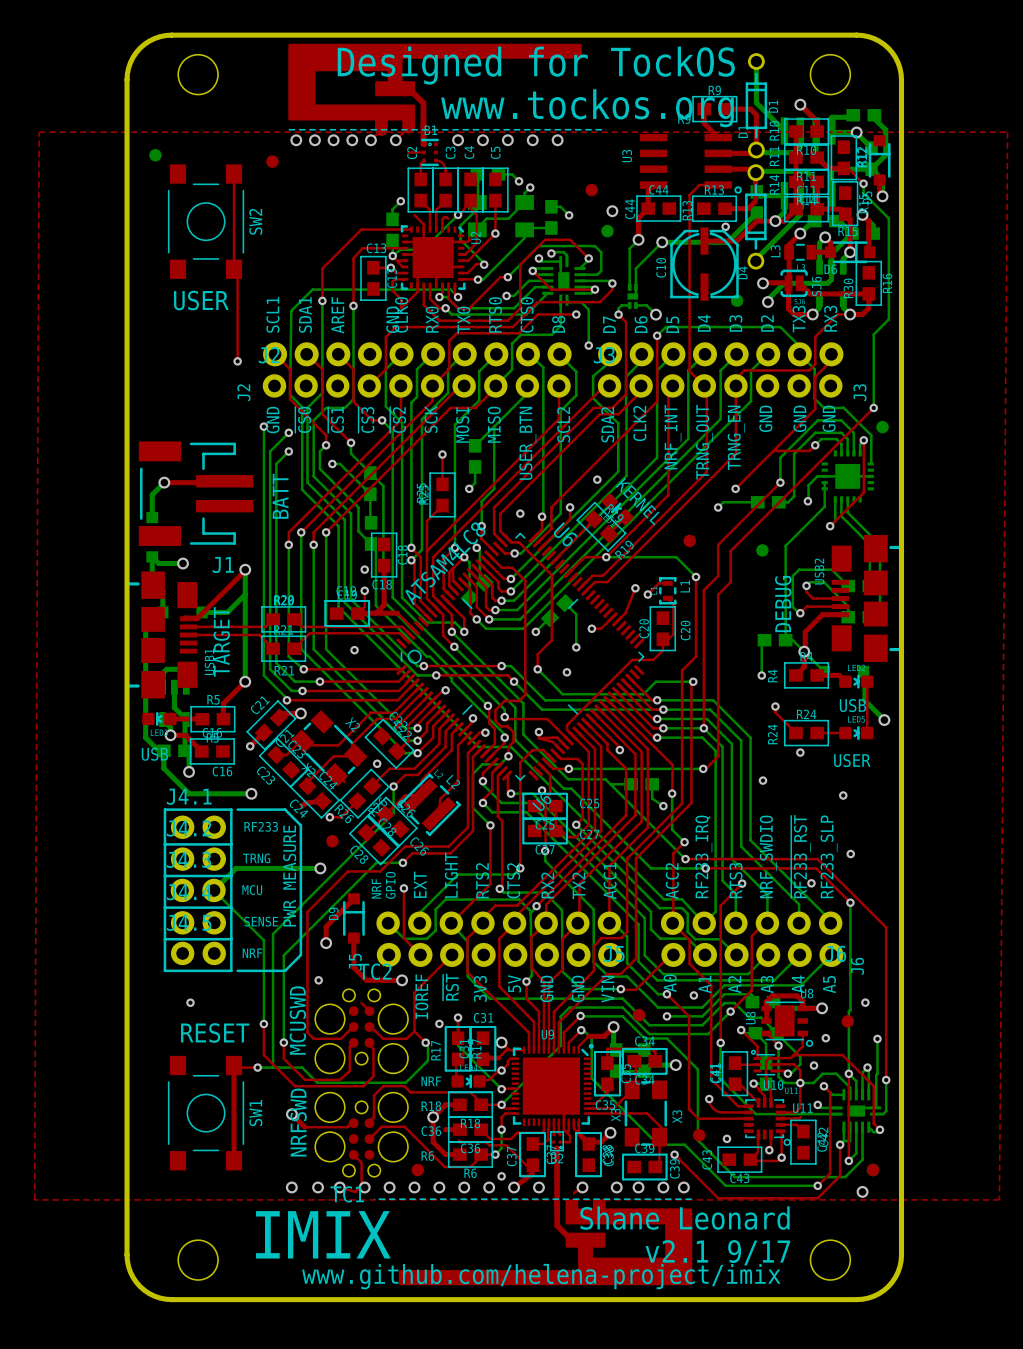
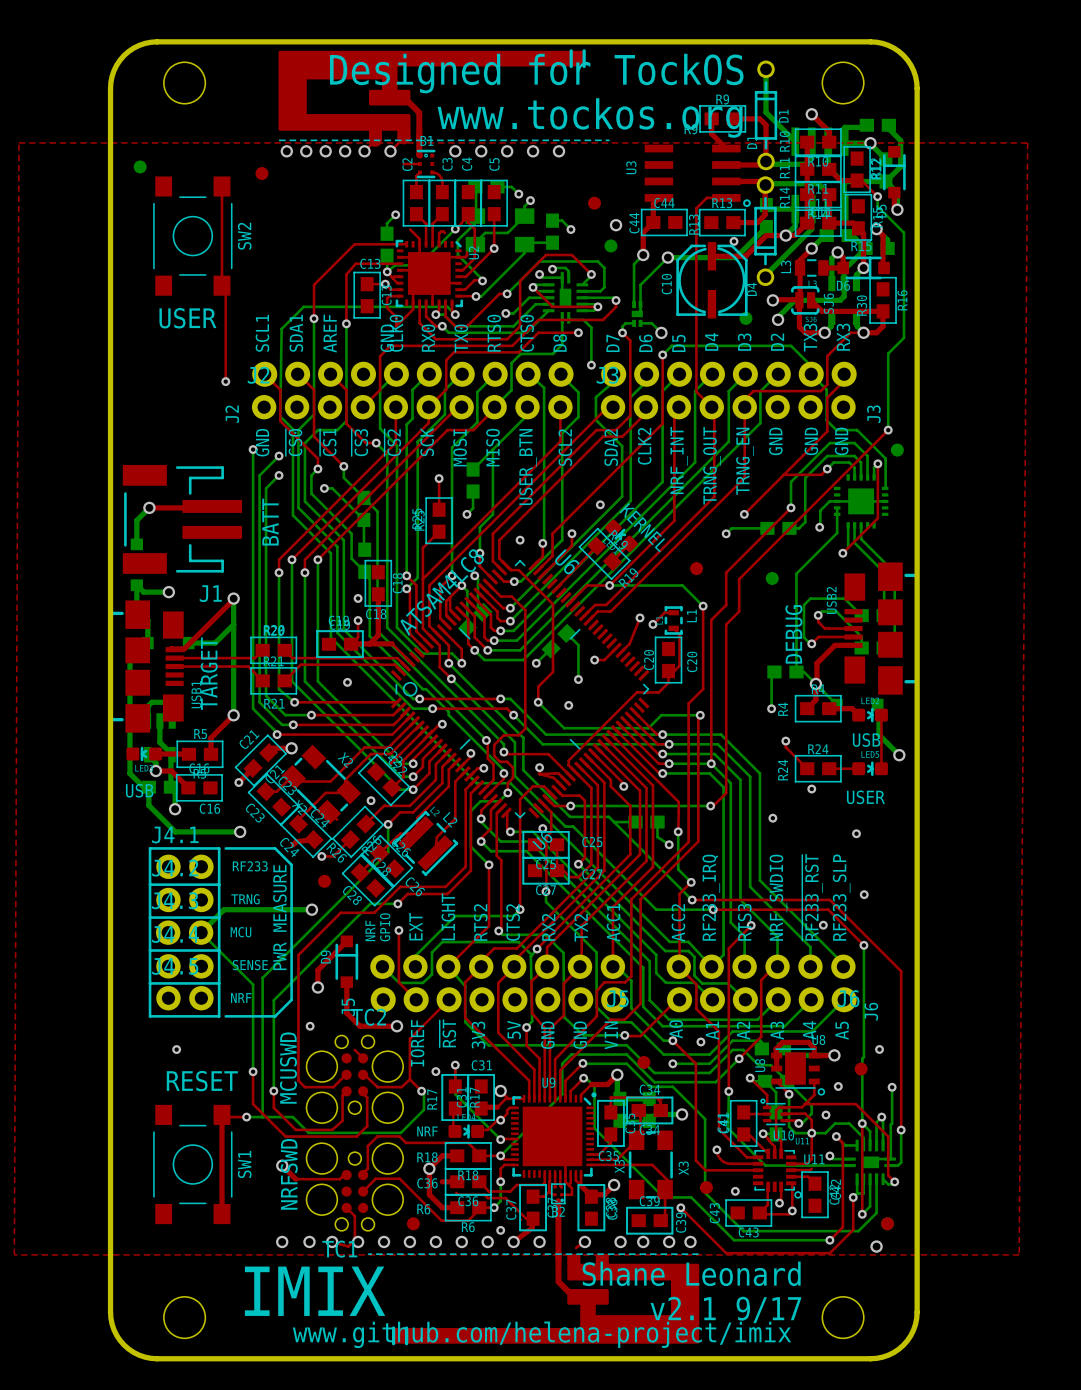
part footprint: [288, 43, 607, 131] -> [278, 49, 611, 142]
part footprint: [373, 1198, 693, 1286] -> [367, 1253, 700, 1346]

